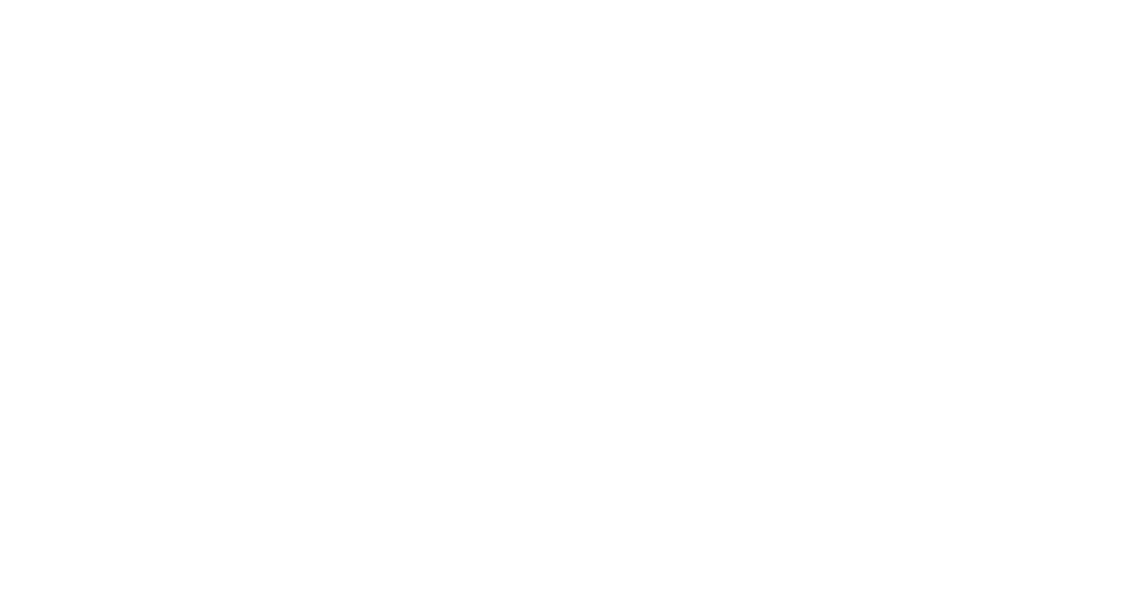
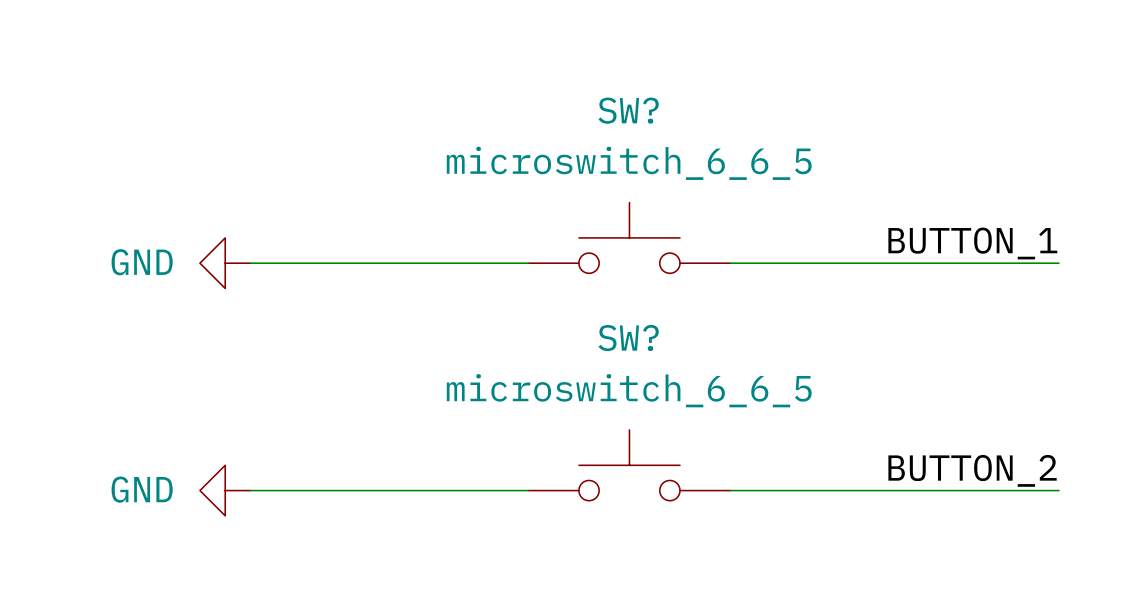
SW?: none -> microswitch_6_6_5 (629, 237)
label: none -> BUTTON_1 (972, 243)
power symbol: none -> GND (225, 263)
wire: none -> (250, 263) (528, 263)
wire: none -> (730, 263) (1058, 263)
SW?: none -> microswitch_6_6_5 (629, 465)
label: none -> BUTTON_2 (972, 470)
power symbol: none -> GND (225, 490)
wire: none -> (250, 490) (528, 490)
wire: none -> (730, 490) (1058, 490)

